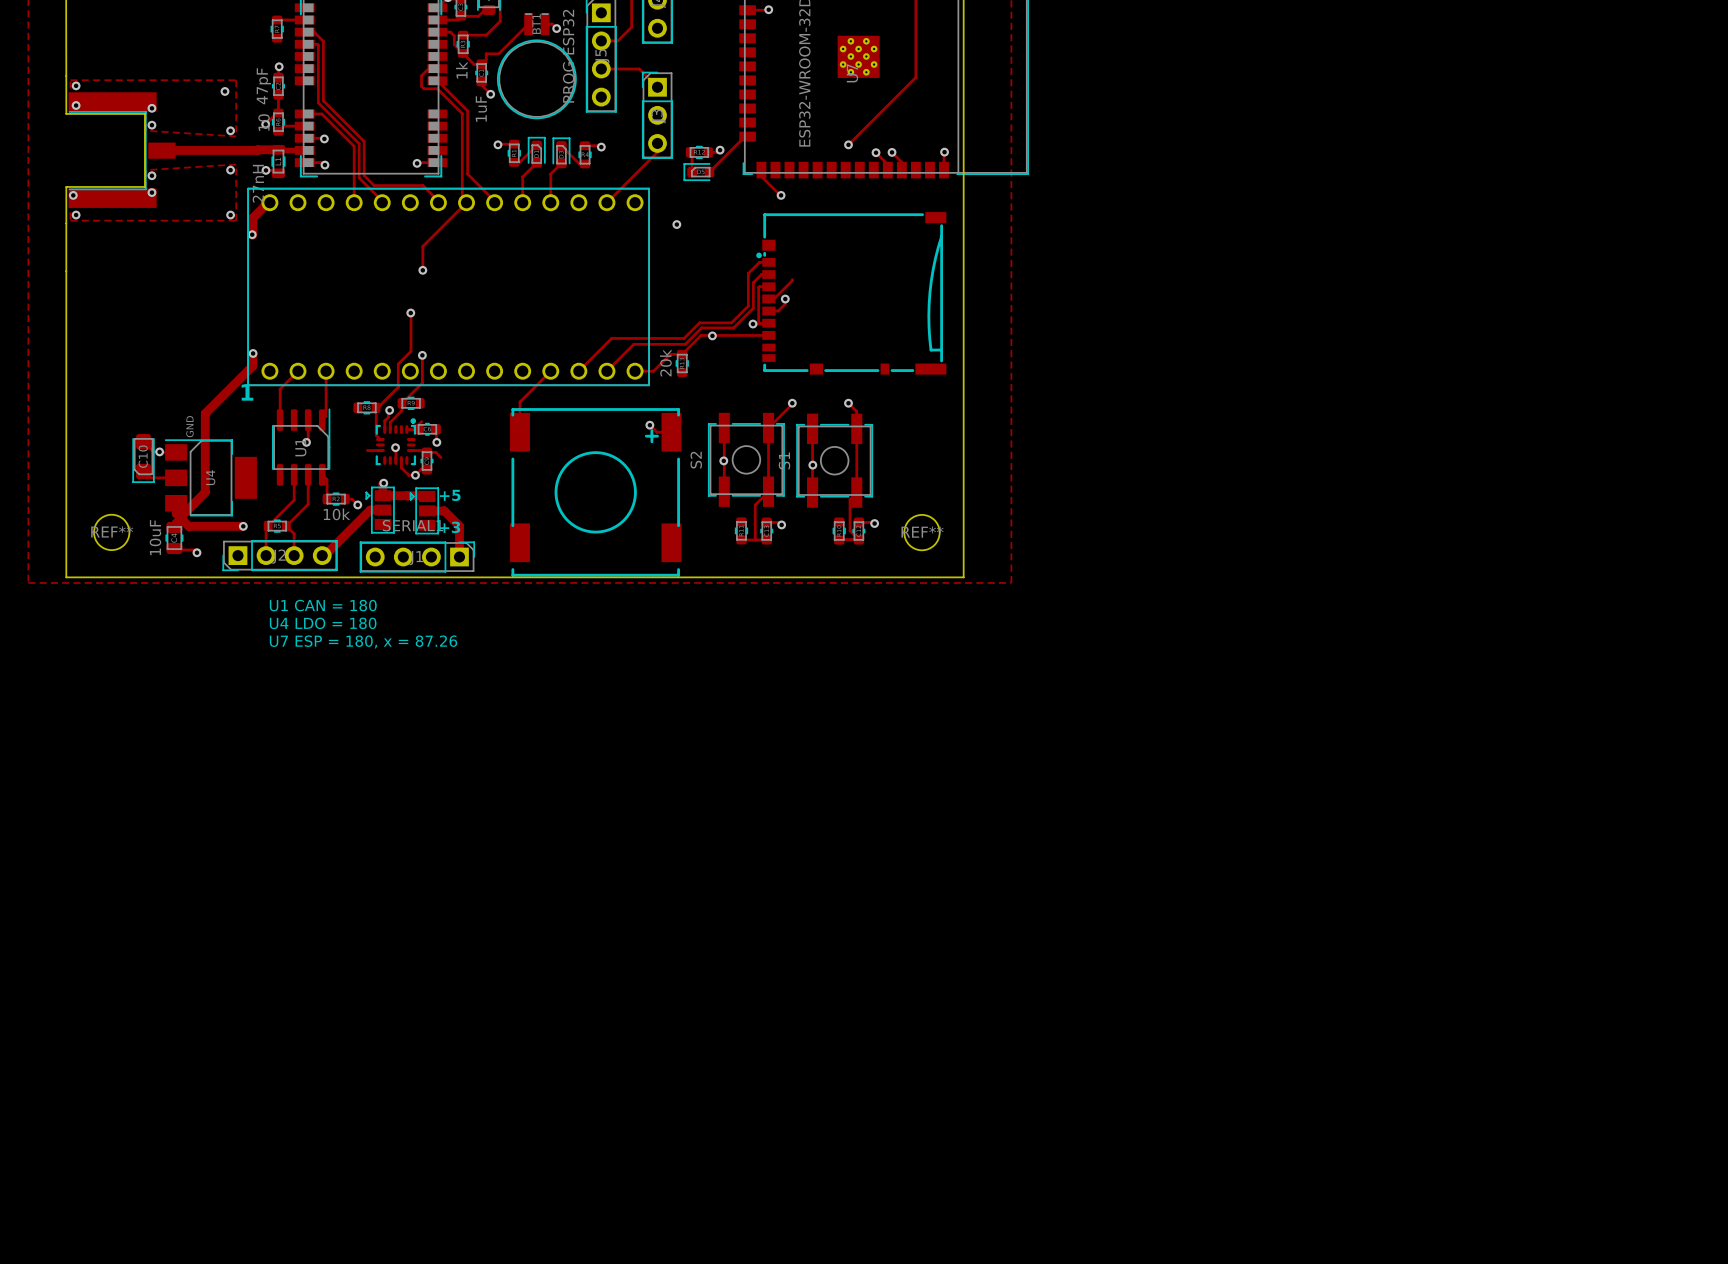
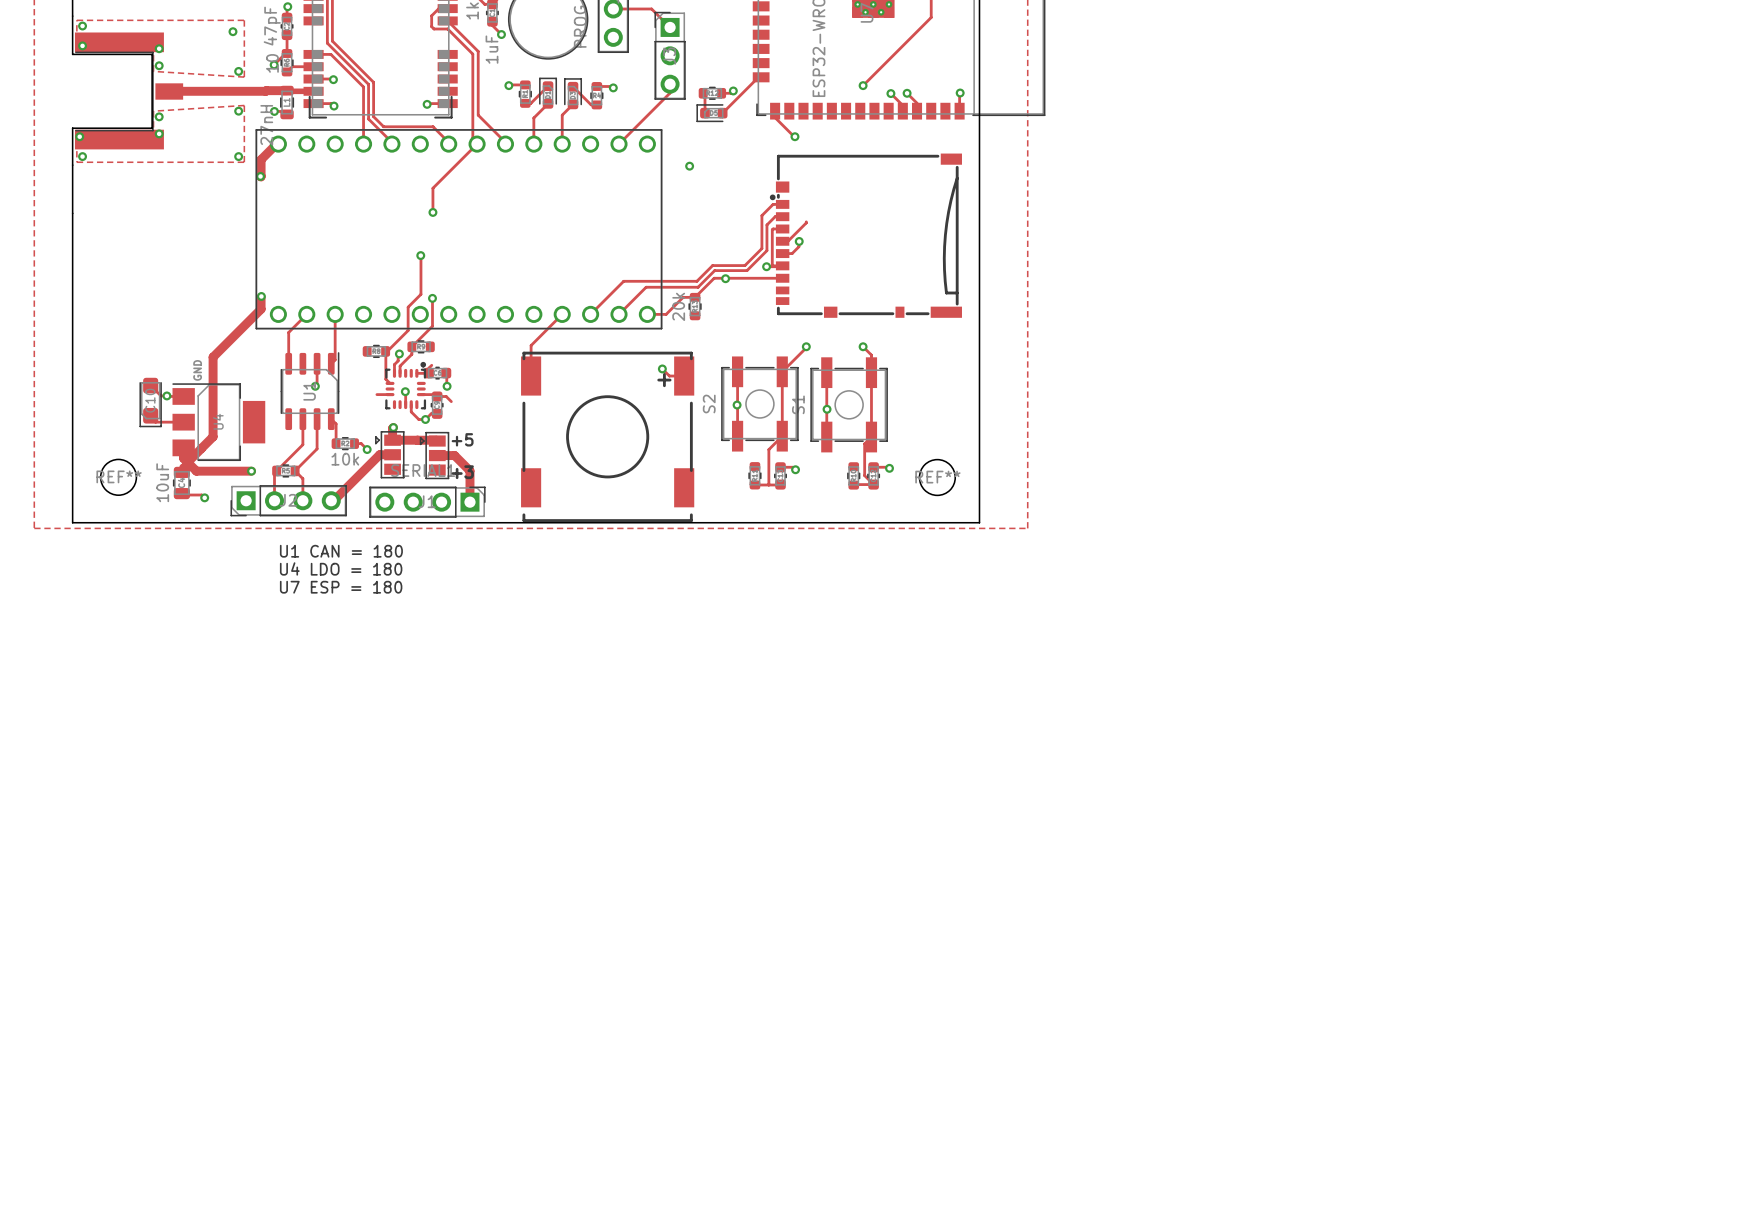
text: 1 (247, 392) -> none
text: U7 ESP = 180, x = 87.26 (363, 641) -> U7 ESP = 180 (341, 587)

